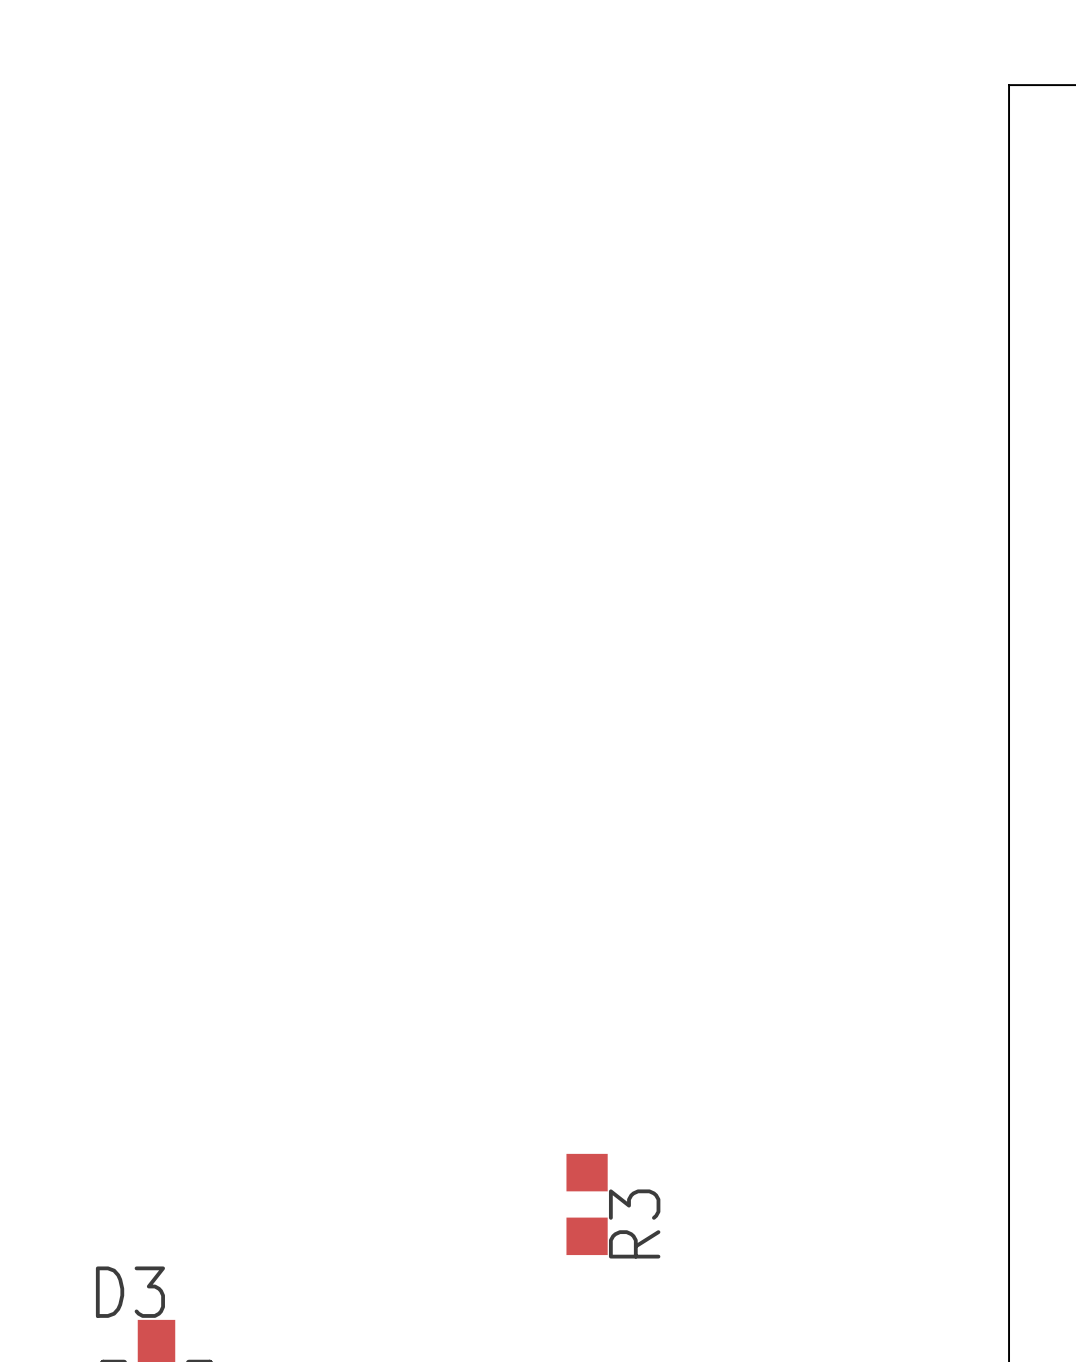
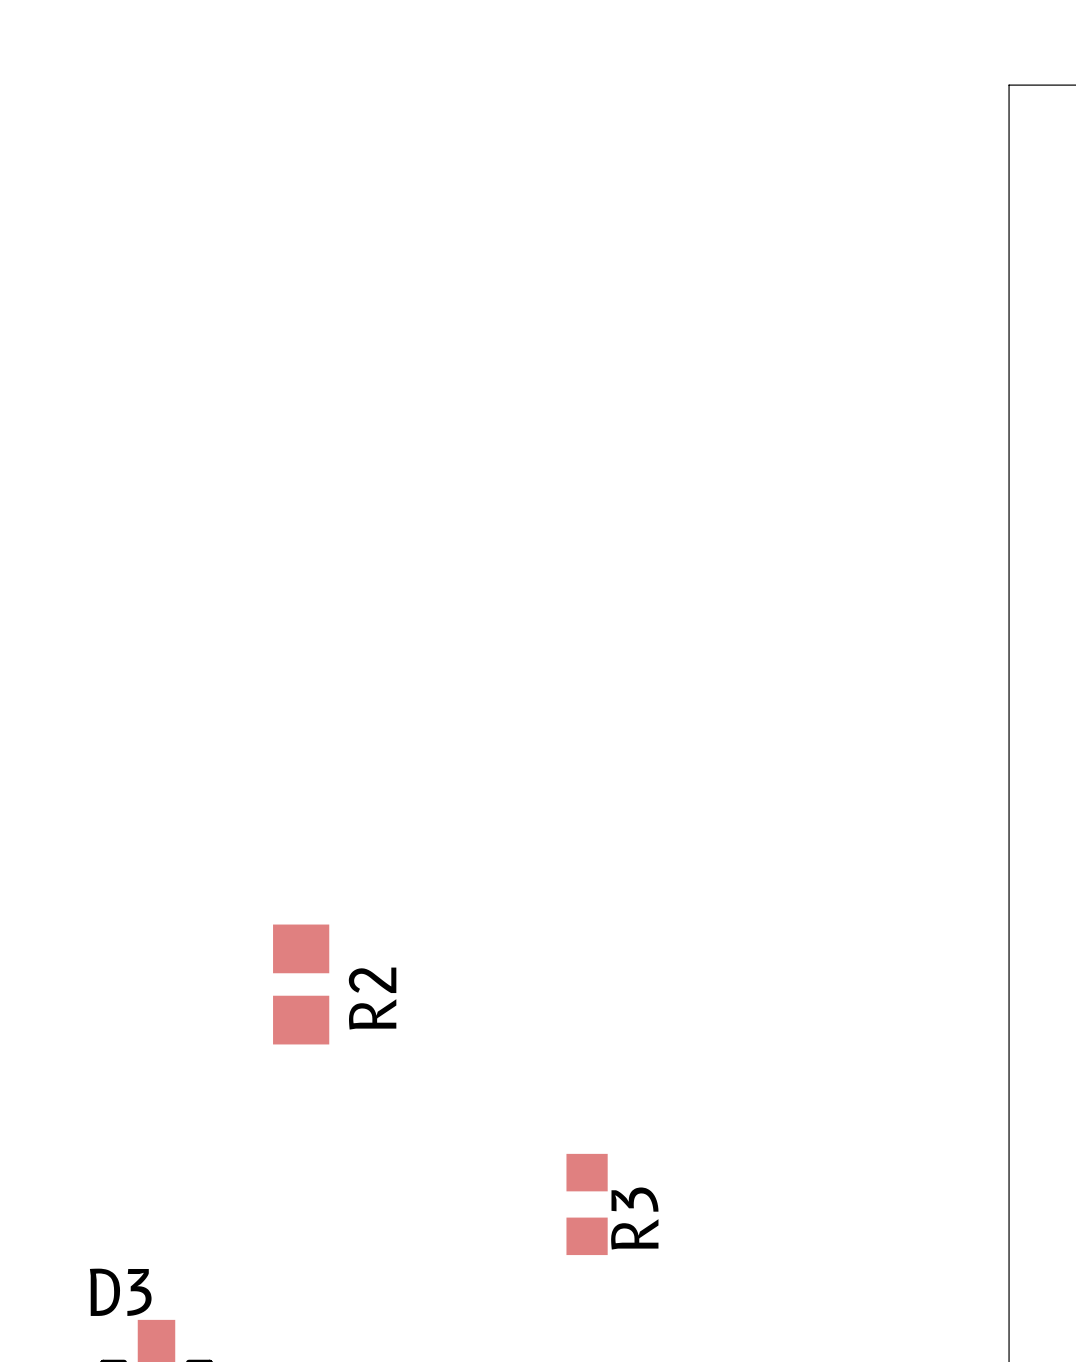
R2: none -> (301, 984)

